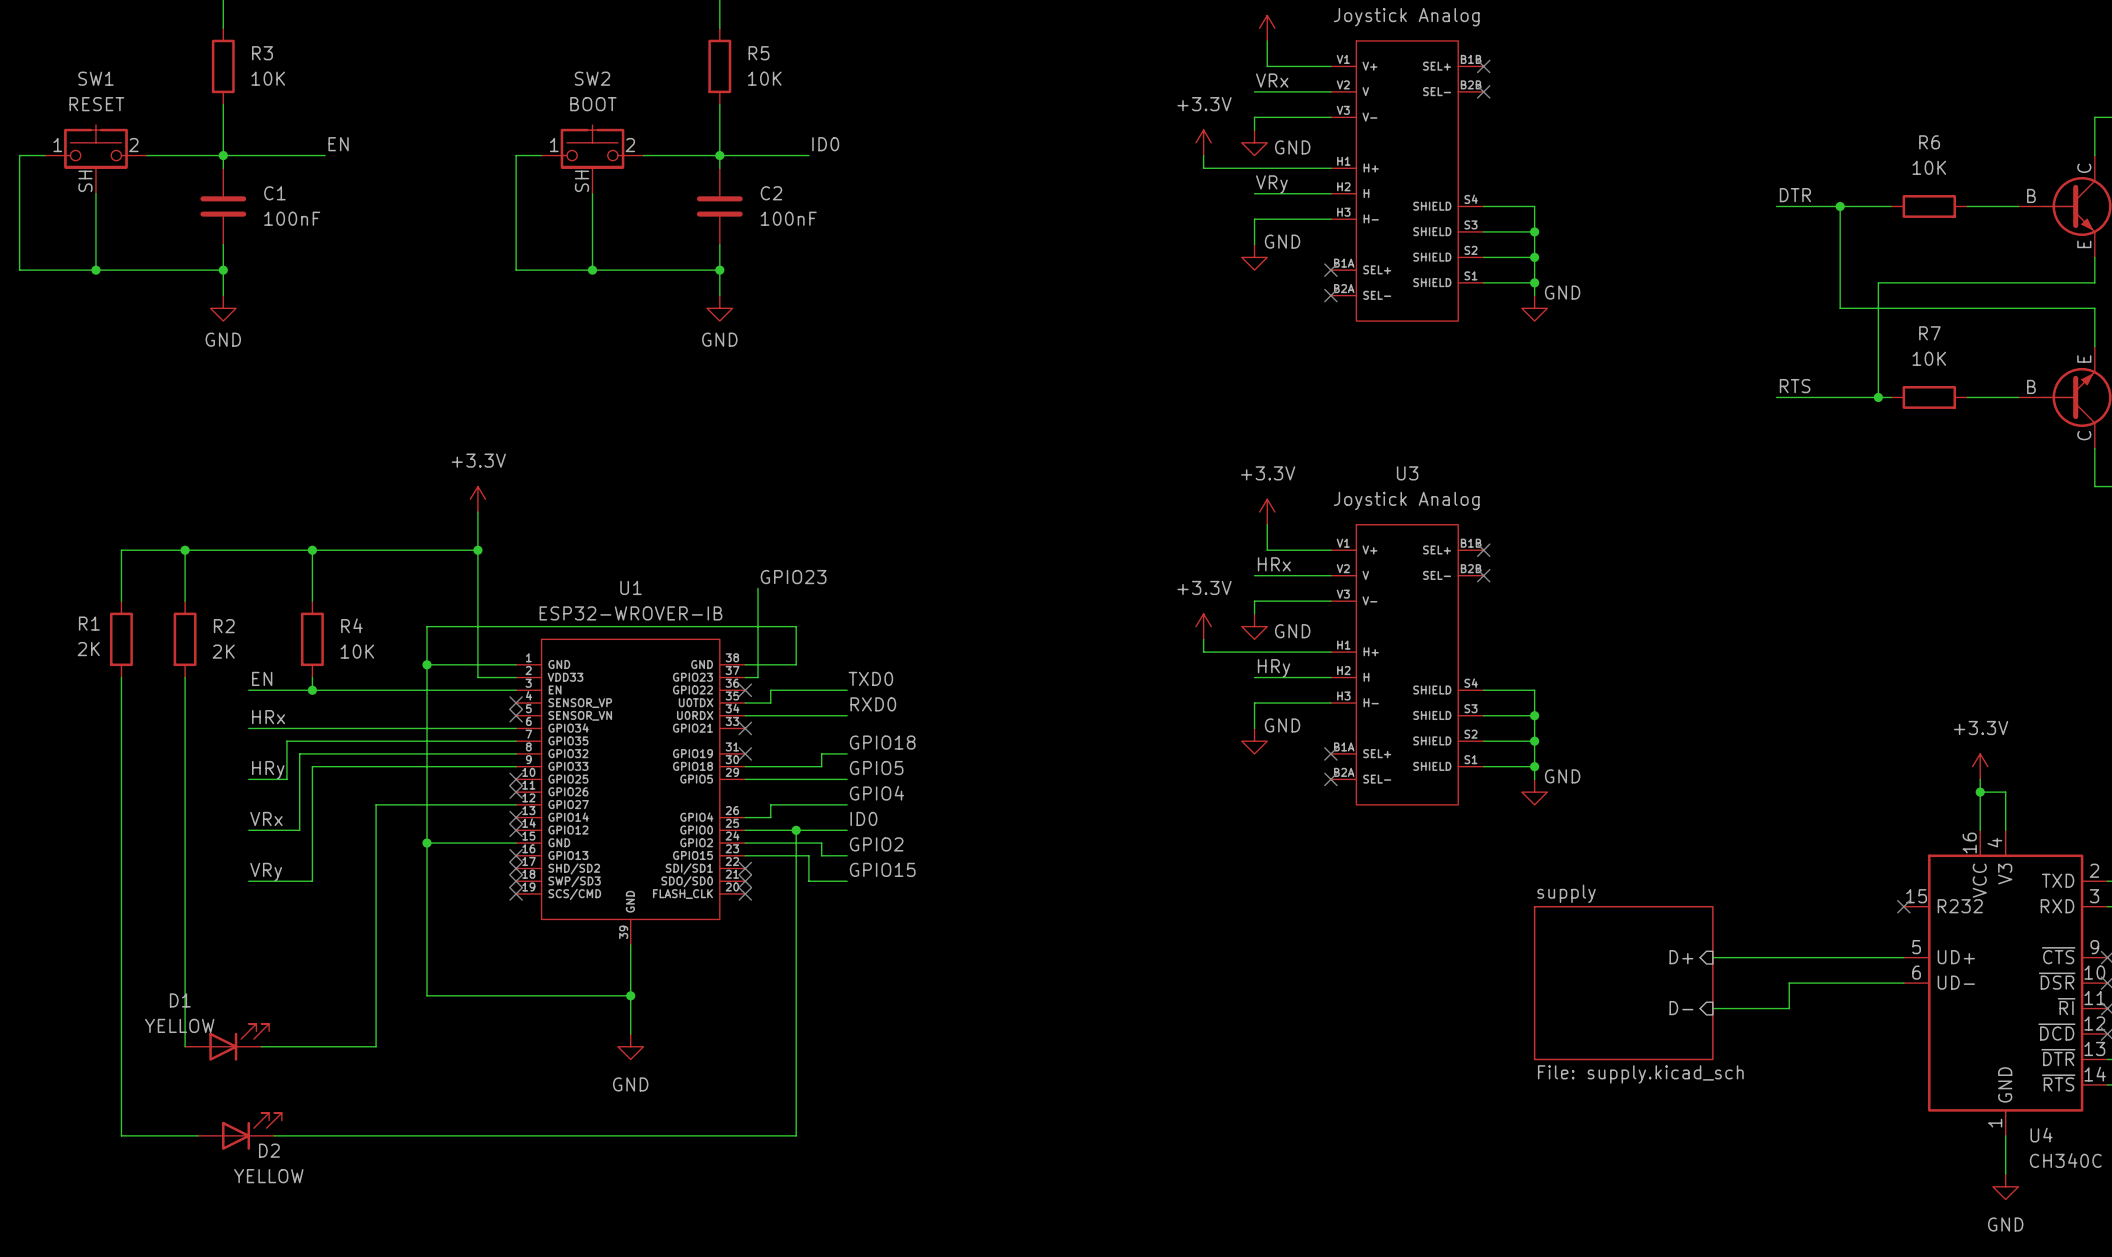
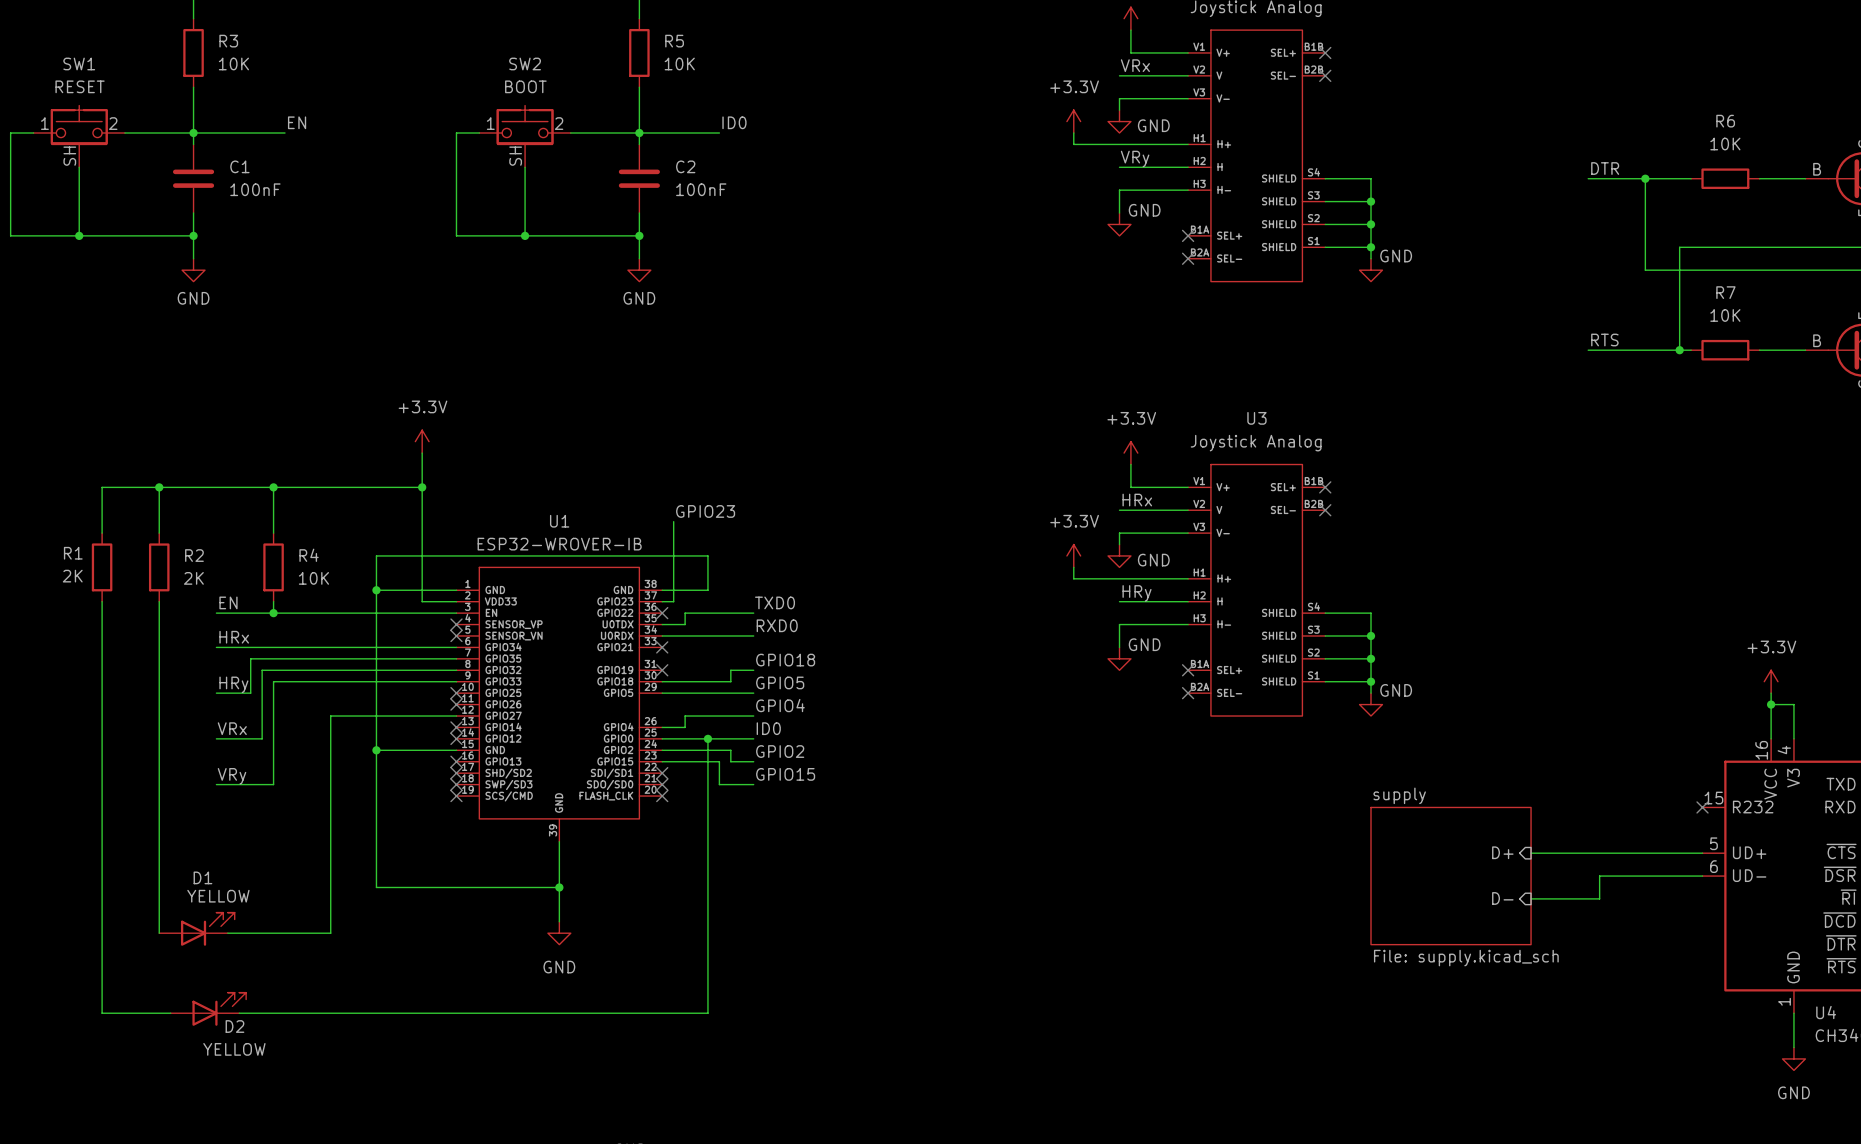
D1 name position: D1 (180, 1000) -> D1 (202, 877)
D1 value position: YELLOW (179, 1025) -> YELLOW (218, 896)

